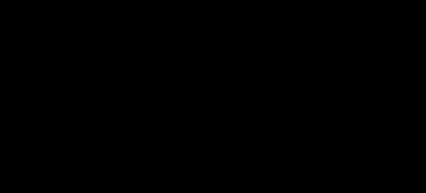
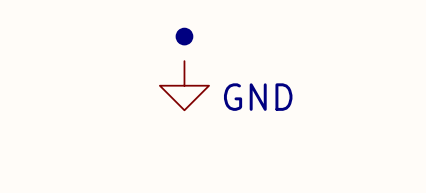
junction: none -> (184, 36)
power symbol: none -> GND (184, 85)

